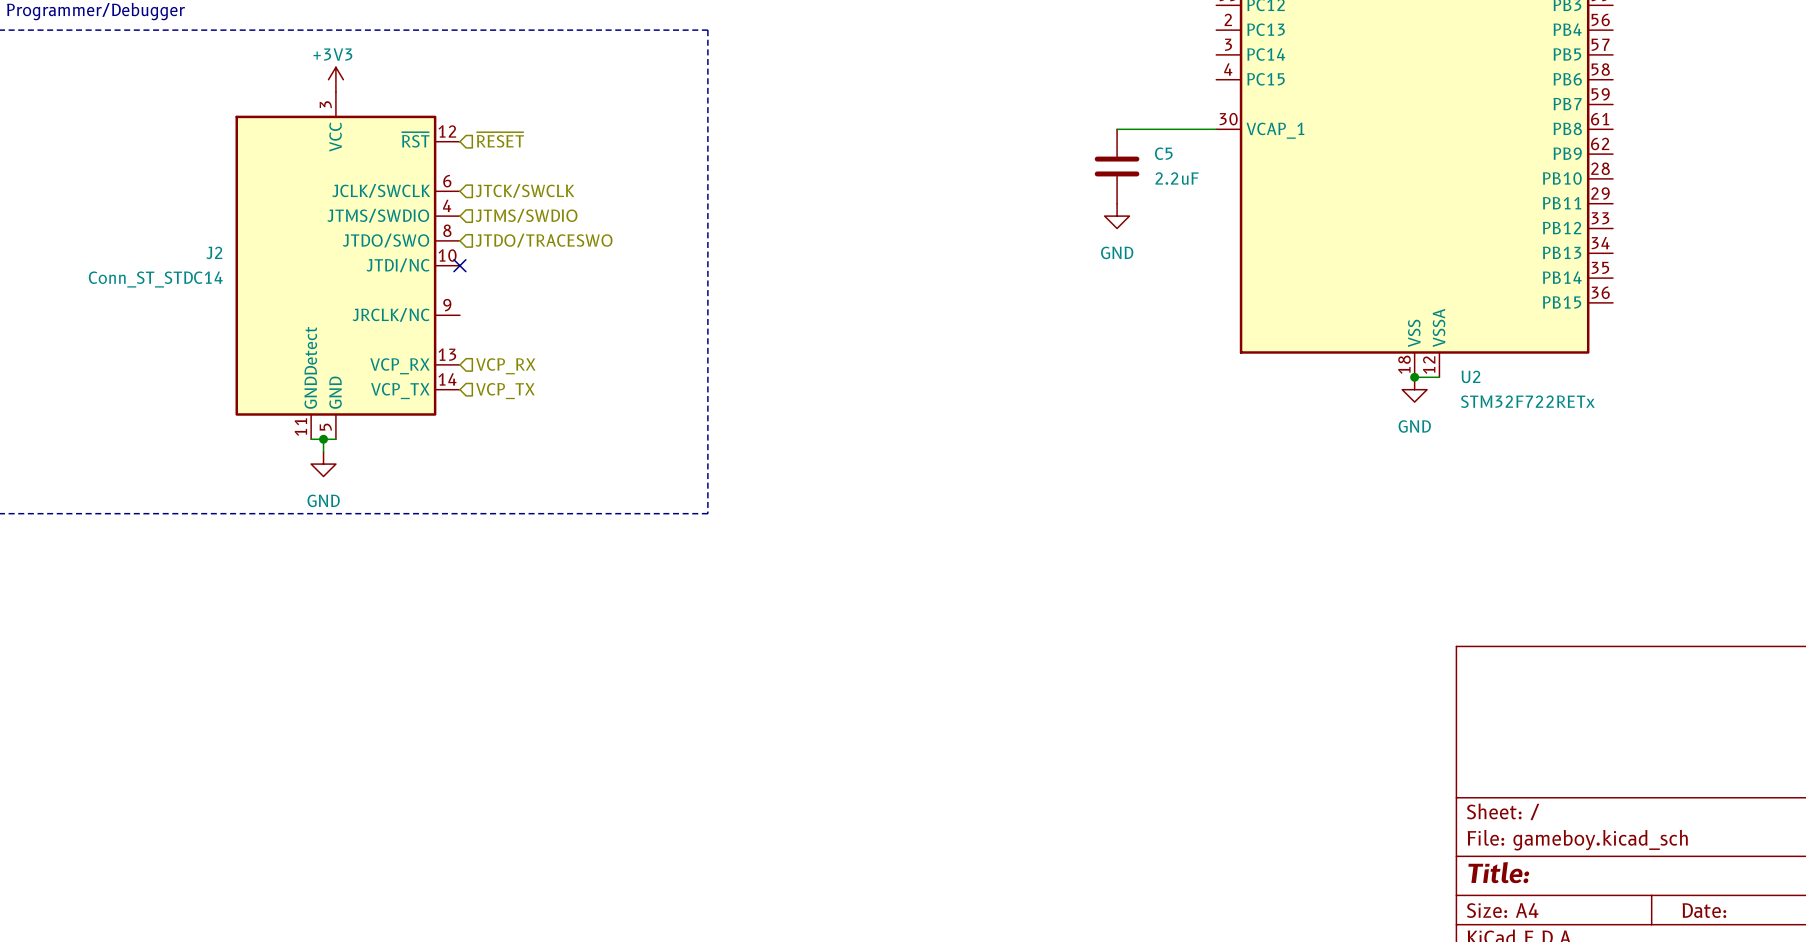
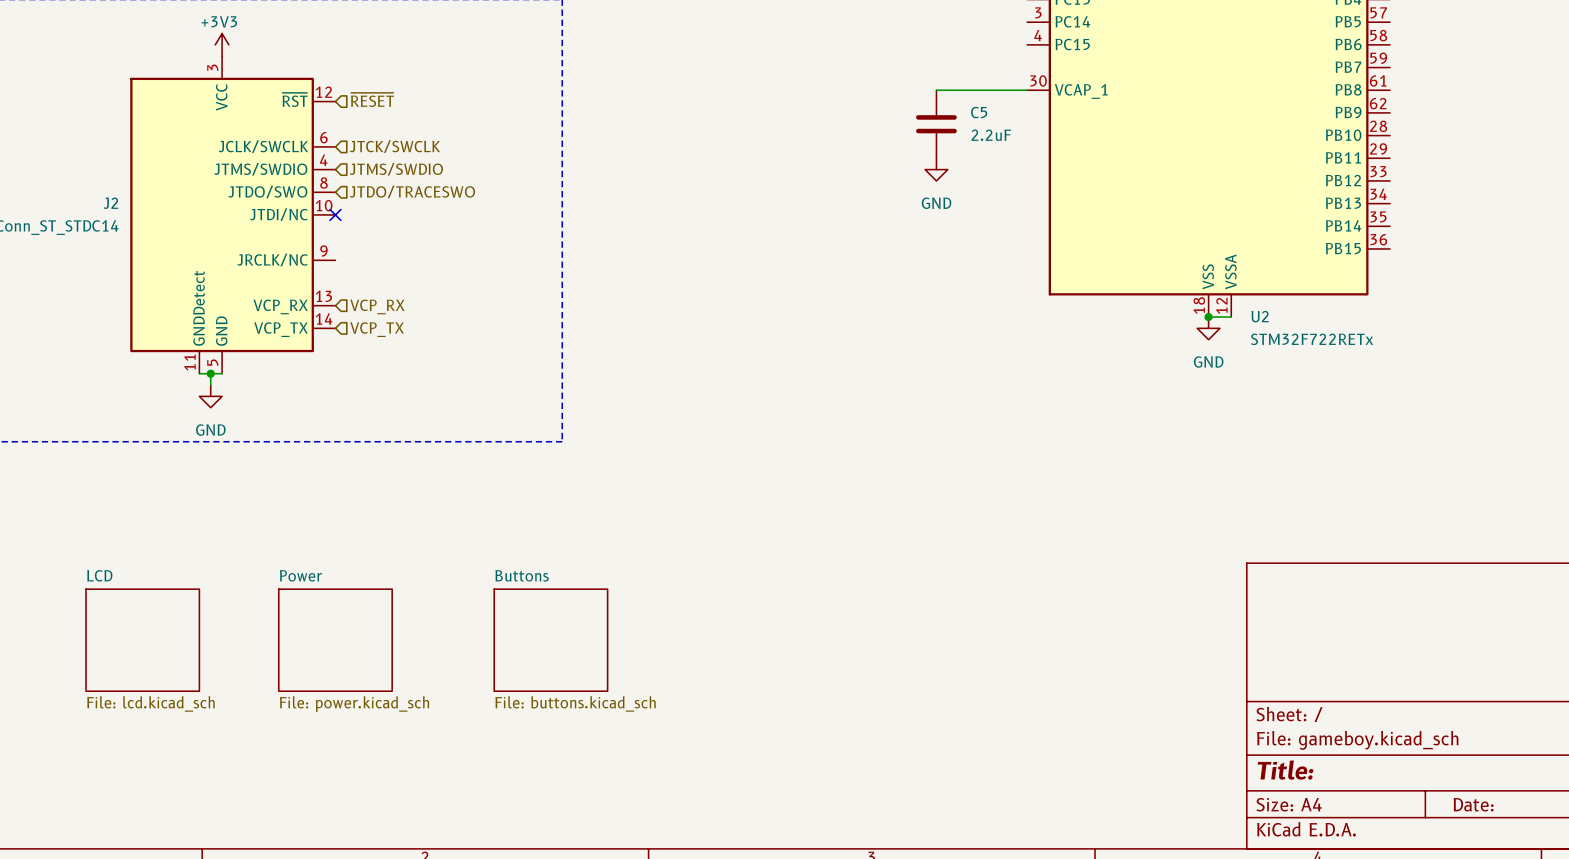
sheet LCD: none -> File: lcd.kicad_sch (142, 640)
sheet Power: none -> File: power.kicad_sch (335, 640)
sheet Buttons: none -> File: buttons.kicad_sch (550, 640)

